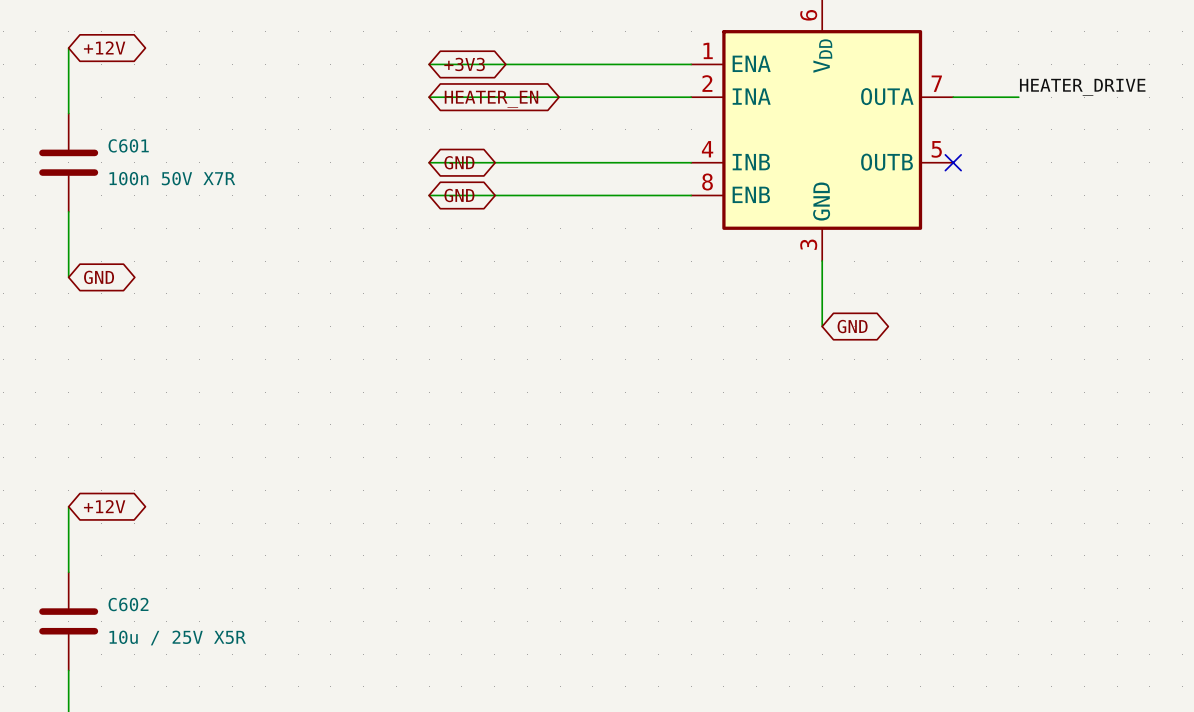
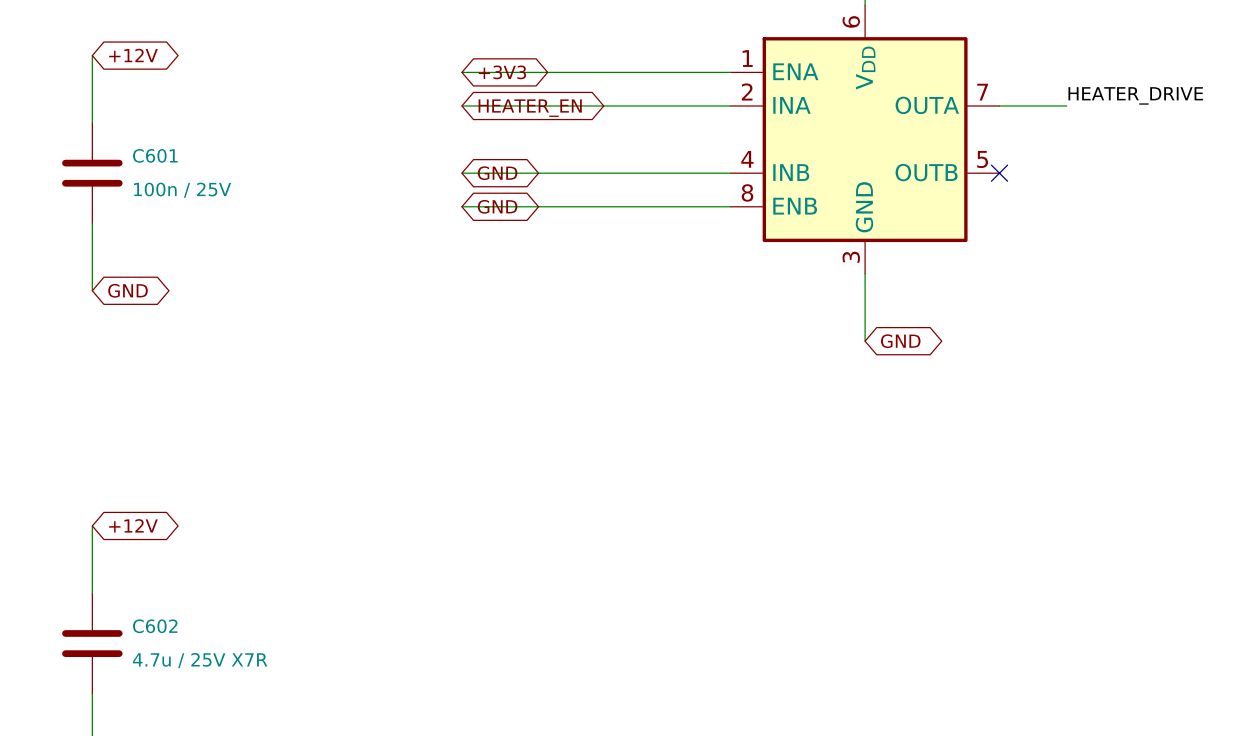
C601 value: 100n 50V X7R (172, 178) -> 100n / 25V (182, 190)
C602 value: 10u / 25V X5R (177, 638) -> 4.7u / 25V X7R (200, 660)

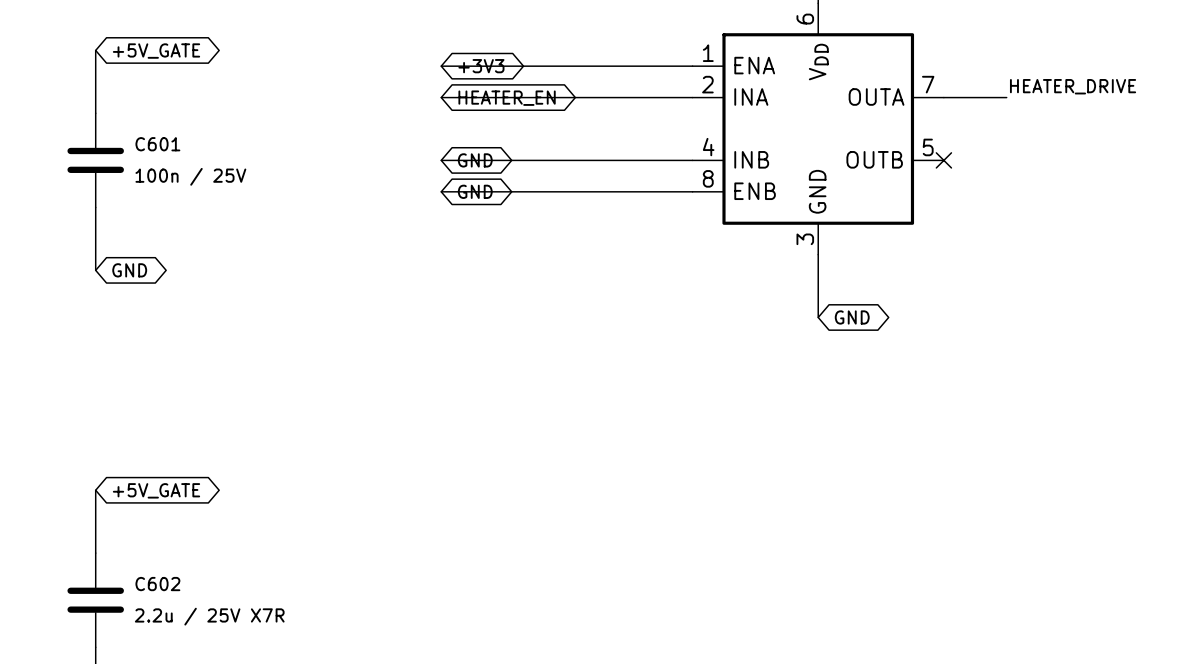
global label: +12V (133, 55) -> +5V_GATE (156, 51)
global label: +12V (133, 525) -> +5V_GATE (156, 490)
C602 value: 4.7u / 25V X7R (200, 660) -> 2.2u / 25V X7R (209, 616)

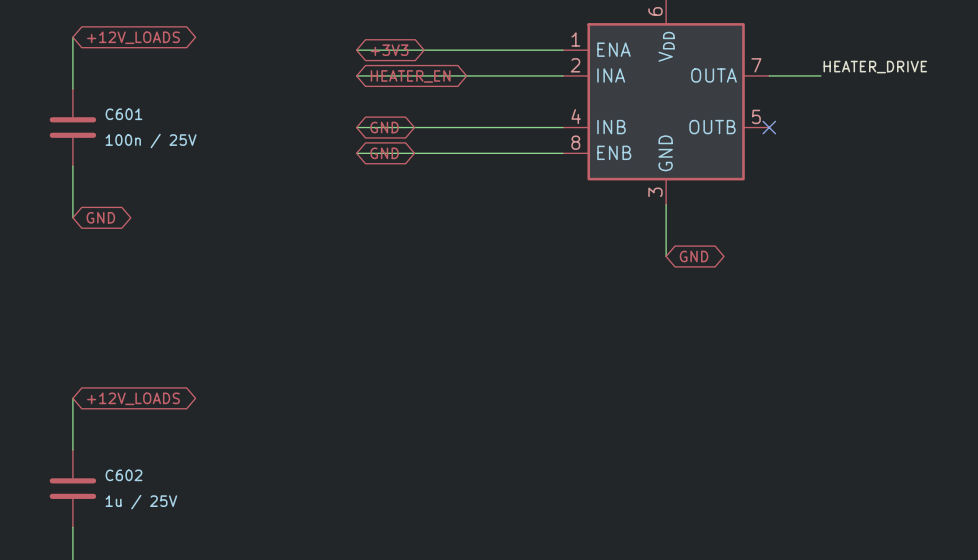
global label: +5V_GATE (156, 51) -> +12V_LOADS (133, 37)
global label: +5V_GATE (156, 490) -> +12V_LOADS (133, 398)
C602 value: 2.2u / 25V X7R (209, 616) -> 1u / 25V (141, 502)

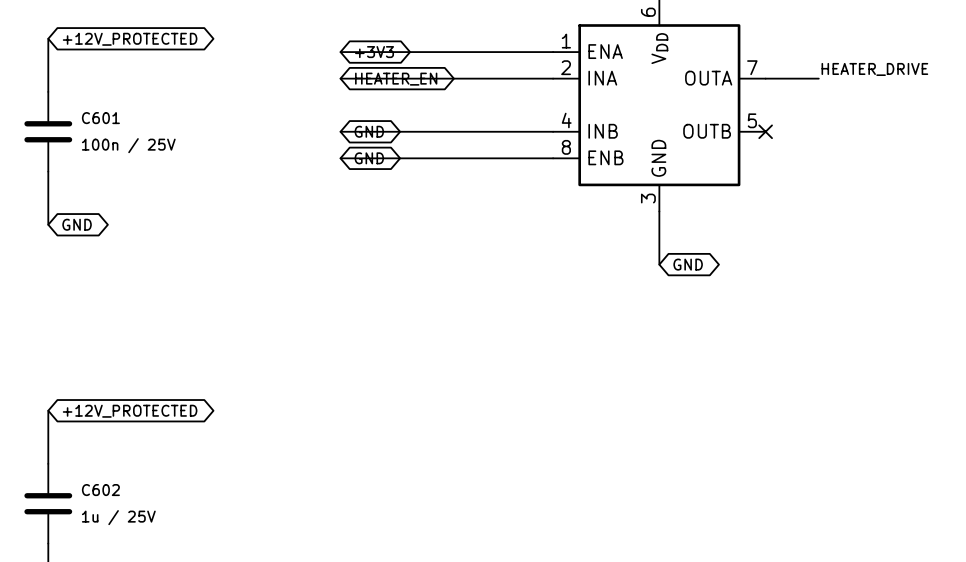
global label: +12V_LOADS (133, 37) -> +12V_PROTECTED (130, 39)
global label: +12V_LOADS (133, 398) -> +12V_PROTECTED (130, 411)

